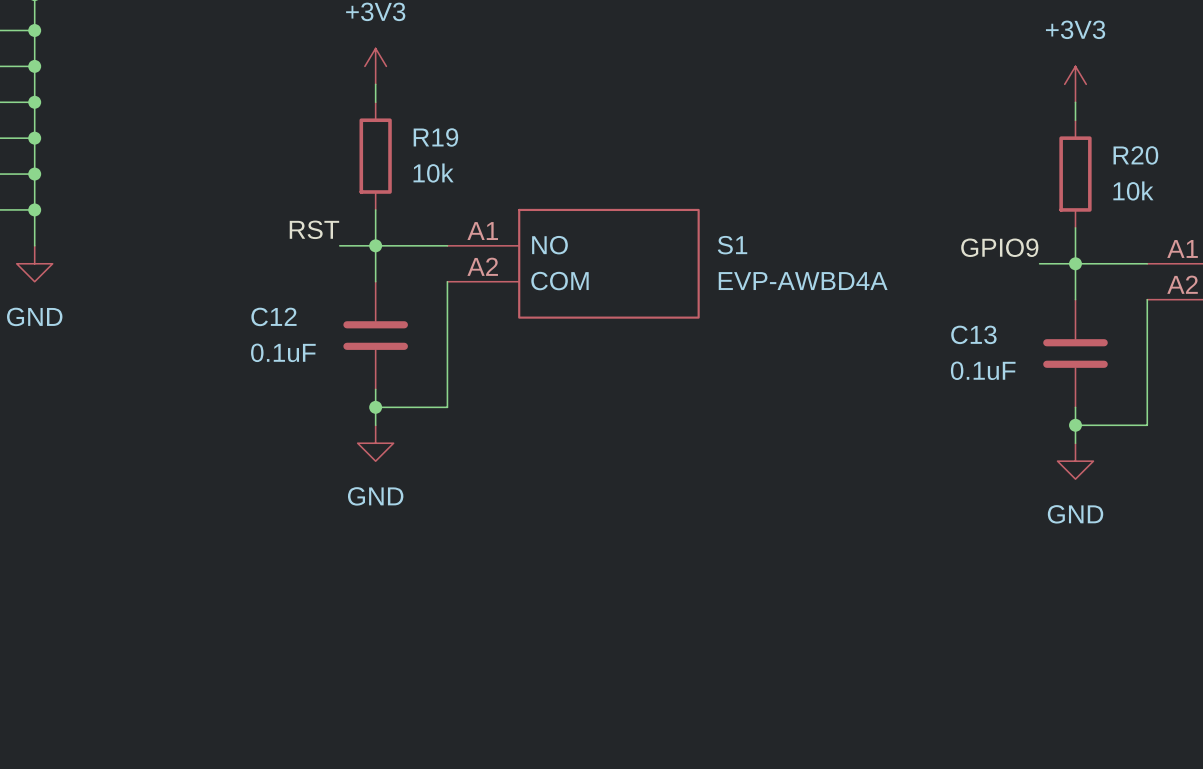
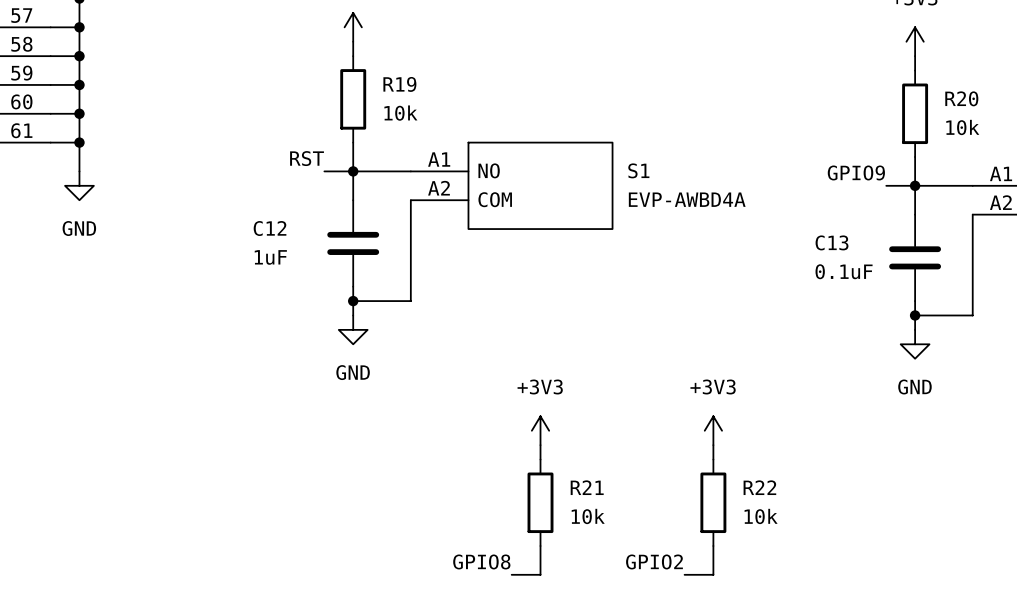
C12 value: 0.1uF (283, 352) -> 1uF (270, 257)
power symbol: none -> +3V3 (540, 430)
power symbol: none -> +3V3 (713, 430)
wire: none -> (540, 445) (540, 459)
wire: none -> (713, 445) (713, 459)
R21: none -> 10k (540, 502)
R22: none -> 10k (713, 502)
wire: none -> (540, 546) (540, 574) (511, 574)
wire: none -> (713, 546) (713, 574) (684, 574)
label: none -> GPIO8 (481, 561)
label: none -> GPIO2 (654, 561)

